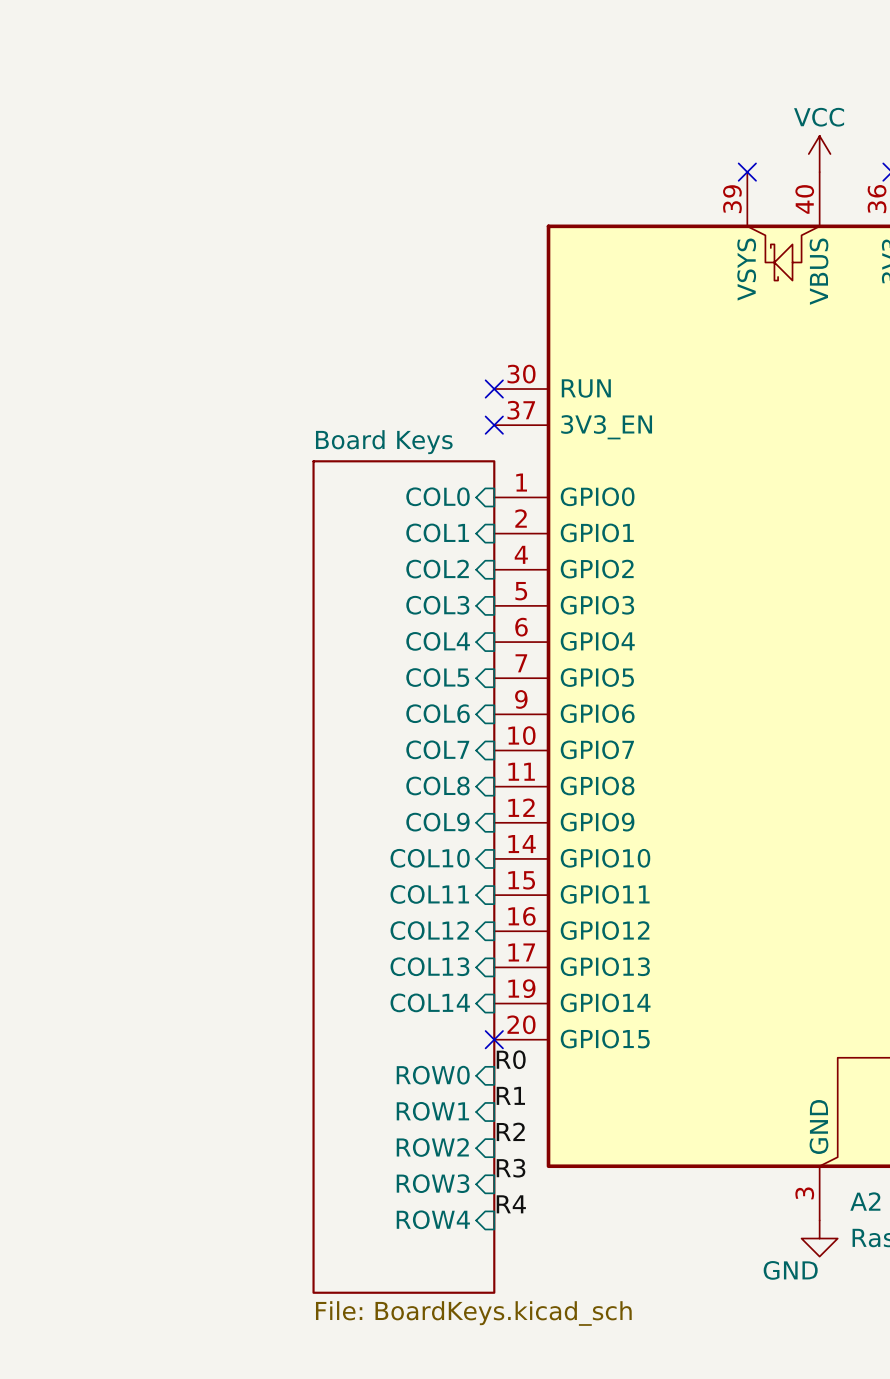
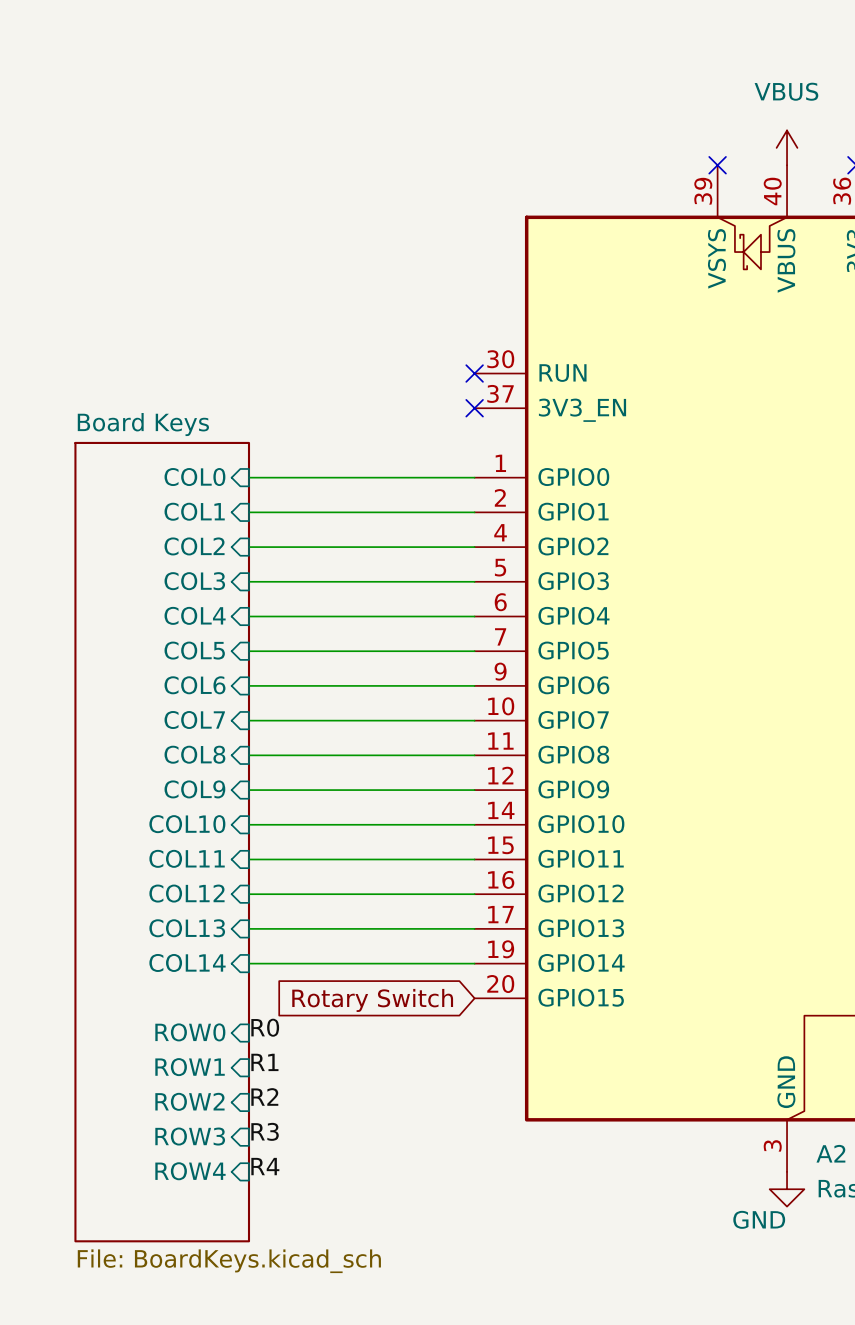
power symbol: VCC (819, 154) -> VBUS (787, 147)
sheet pin position: COL0 (438, 496) -> COL0 (194, 477)
wire: none -> (249, 477) (474, 477)
sheet pin position: COL1 (437, 532) -> COL1 (194, 511)
wire: none -> (249, 512) (474, 512)
wire: none -> (249, 547) (474, 547)
sheet pin position: COL2 (437, 569) -> COL2 (194, 546)
wire: none -> (249, 581) (474, 581)
sheet pin position: COL3 (437, 605) -> COL3 (194, 581)
sheet pin position: COL4 (438, 641) -> COL4 (195, 615)
wire: none -> (249, 616) (474, 616)
sheet pin position: COL5 (437, 677) -> COL5 (194, 650)
wire: none -> (249, 651) (474, 651)
sheet pin position: COL6 (438, 713) -> COL6 (194, 685)
wire: none -> (249, 685) (474, 685)
sheet pin position: COL7 (437, 749) -> COL7 (194, 720)
wire: none -> (249, 720) (474, 720)
sheet pin position: COL8 (437, 785) -> COL8 (194, 754)
wire: none -> (249, 755) (474, 755)
wire: none -> (249, 790) (474, 790)
sheet pin position: COL9 (437, 822) -> COL9 (194, 789)
wire: none -> (249, 824) (474, 824)
sheet pin position: COL10 (430, 858) -> COL10 (187, 824)
sheet Board Keys position: (403, 877) -> (162, 842)
sheet pin position: COL11 (429, 894) -> COL11 (187, 858)
wire: none -> (249, 859) (474, 859)
sheet pin position: COL12 (429, 930) -> COL12 (186, 893)
wire: none -> (249, 894) (474, 894)
sheet pin position: COL13 (429, 966) -> COL13 (187, 928)
wire: none -> (249, 928) (474, 928)
sheet pin position: COL14 (430, 1002) -> COL14 (187, 962)
wire: none -> (249, 963) (474, 963)
no-connect mark: (494, 1039) -> none
global label: none -> Rotary Switch (372, 1000)
label position: R0 (511, 1059) -> R0 (265, 1027)
sheet pin position: ROW0 (433, 1075) -> ROW0 (190, 1032)
label position: R1 (510, 1095) -> R1 (264, 1062)
sheet pin position: ROW1 (432, 1111) -> ROW1 (190, 1067)
label position: R2 (510, 1131) -> R2 (264, 1096)
sheet pin position: ROW2 (432, 1147) -> ROW2 (189, 1101)
label position: R3 (511, 1168) -> R3 (265, 1131)
sheet pin position: ROW3 (433, 1183) -> ROW3 (190, 1136)
label position: R4 (511, 1204) -> R4 (265, 1166)
sheet pin position: ROW4 (433, 1219) -> ROW4 (190, 1171)

